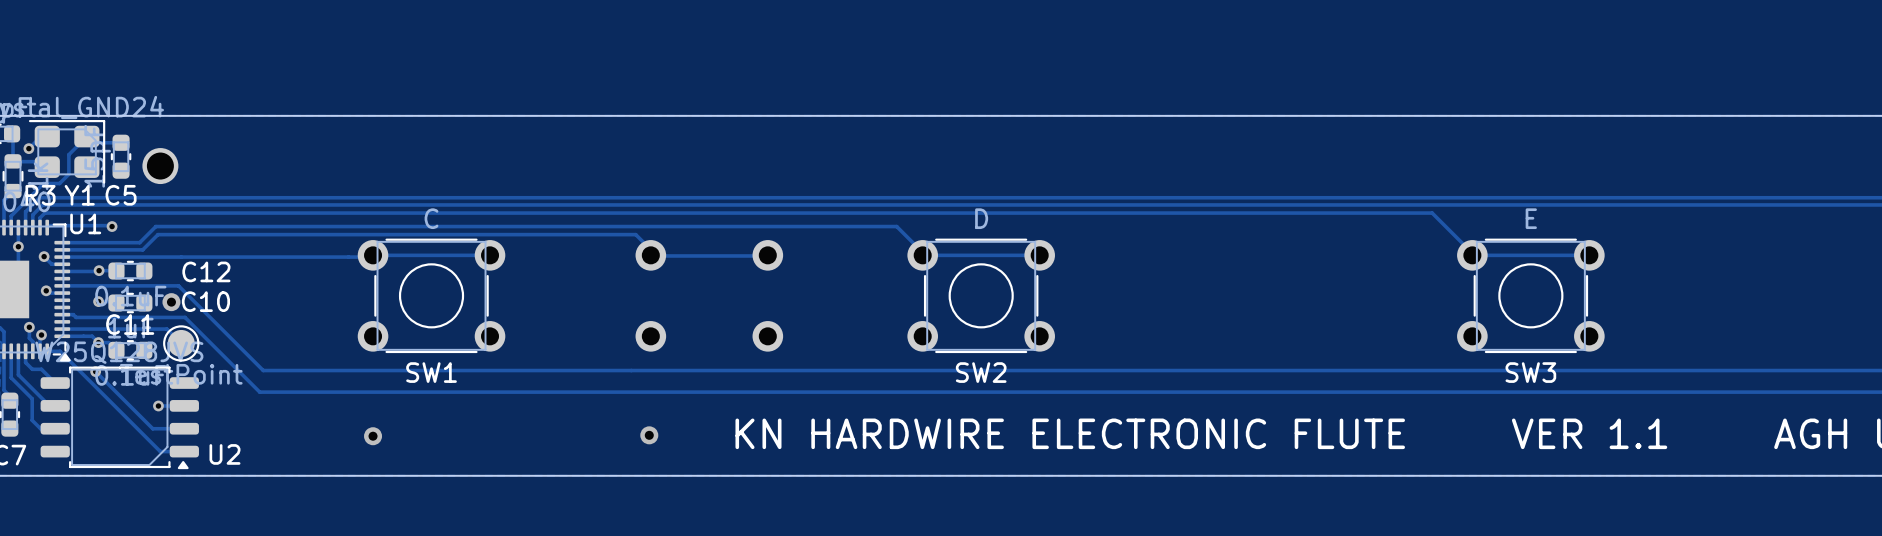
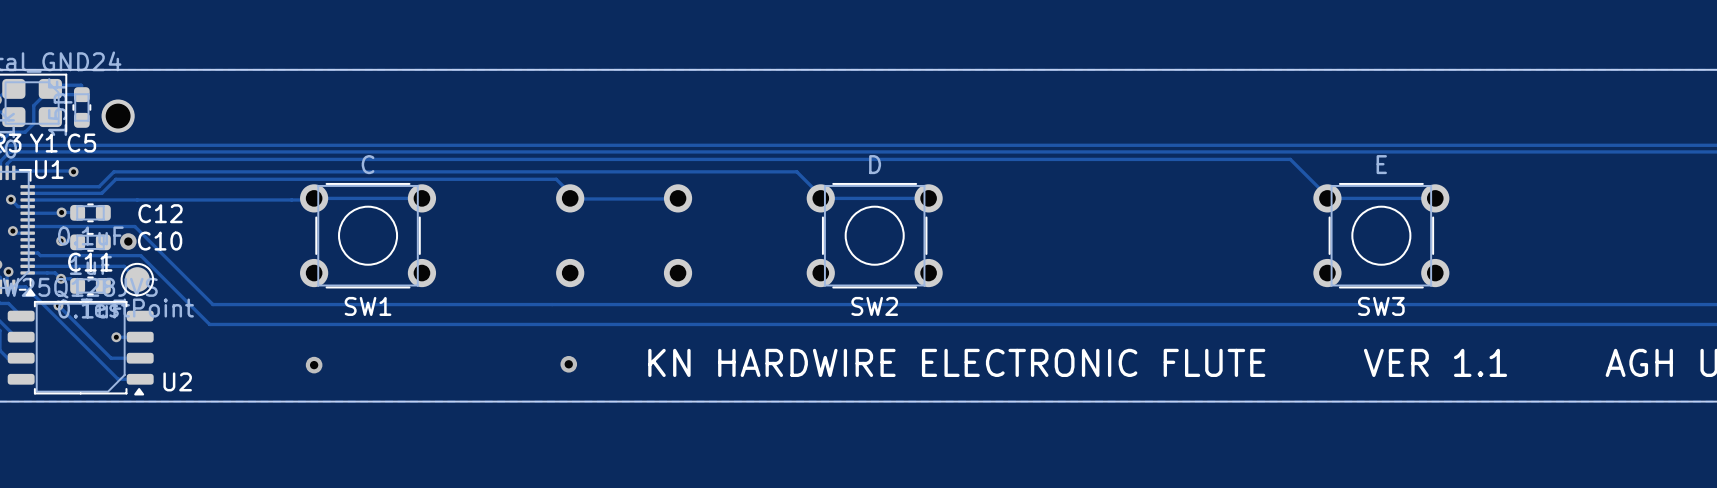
track: none -> (54, 85) (81, 86)

